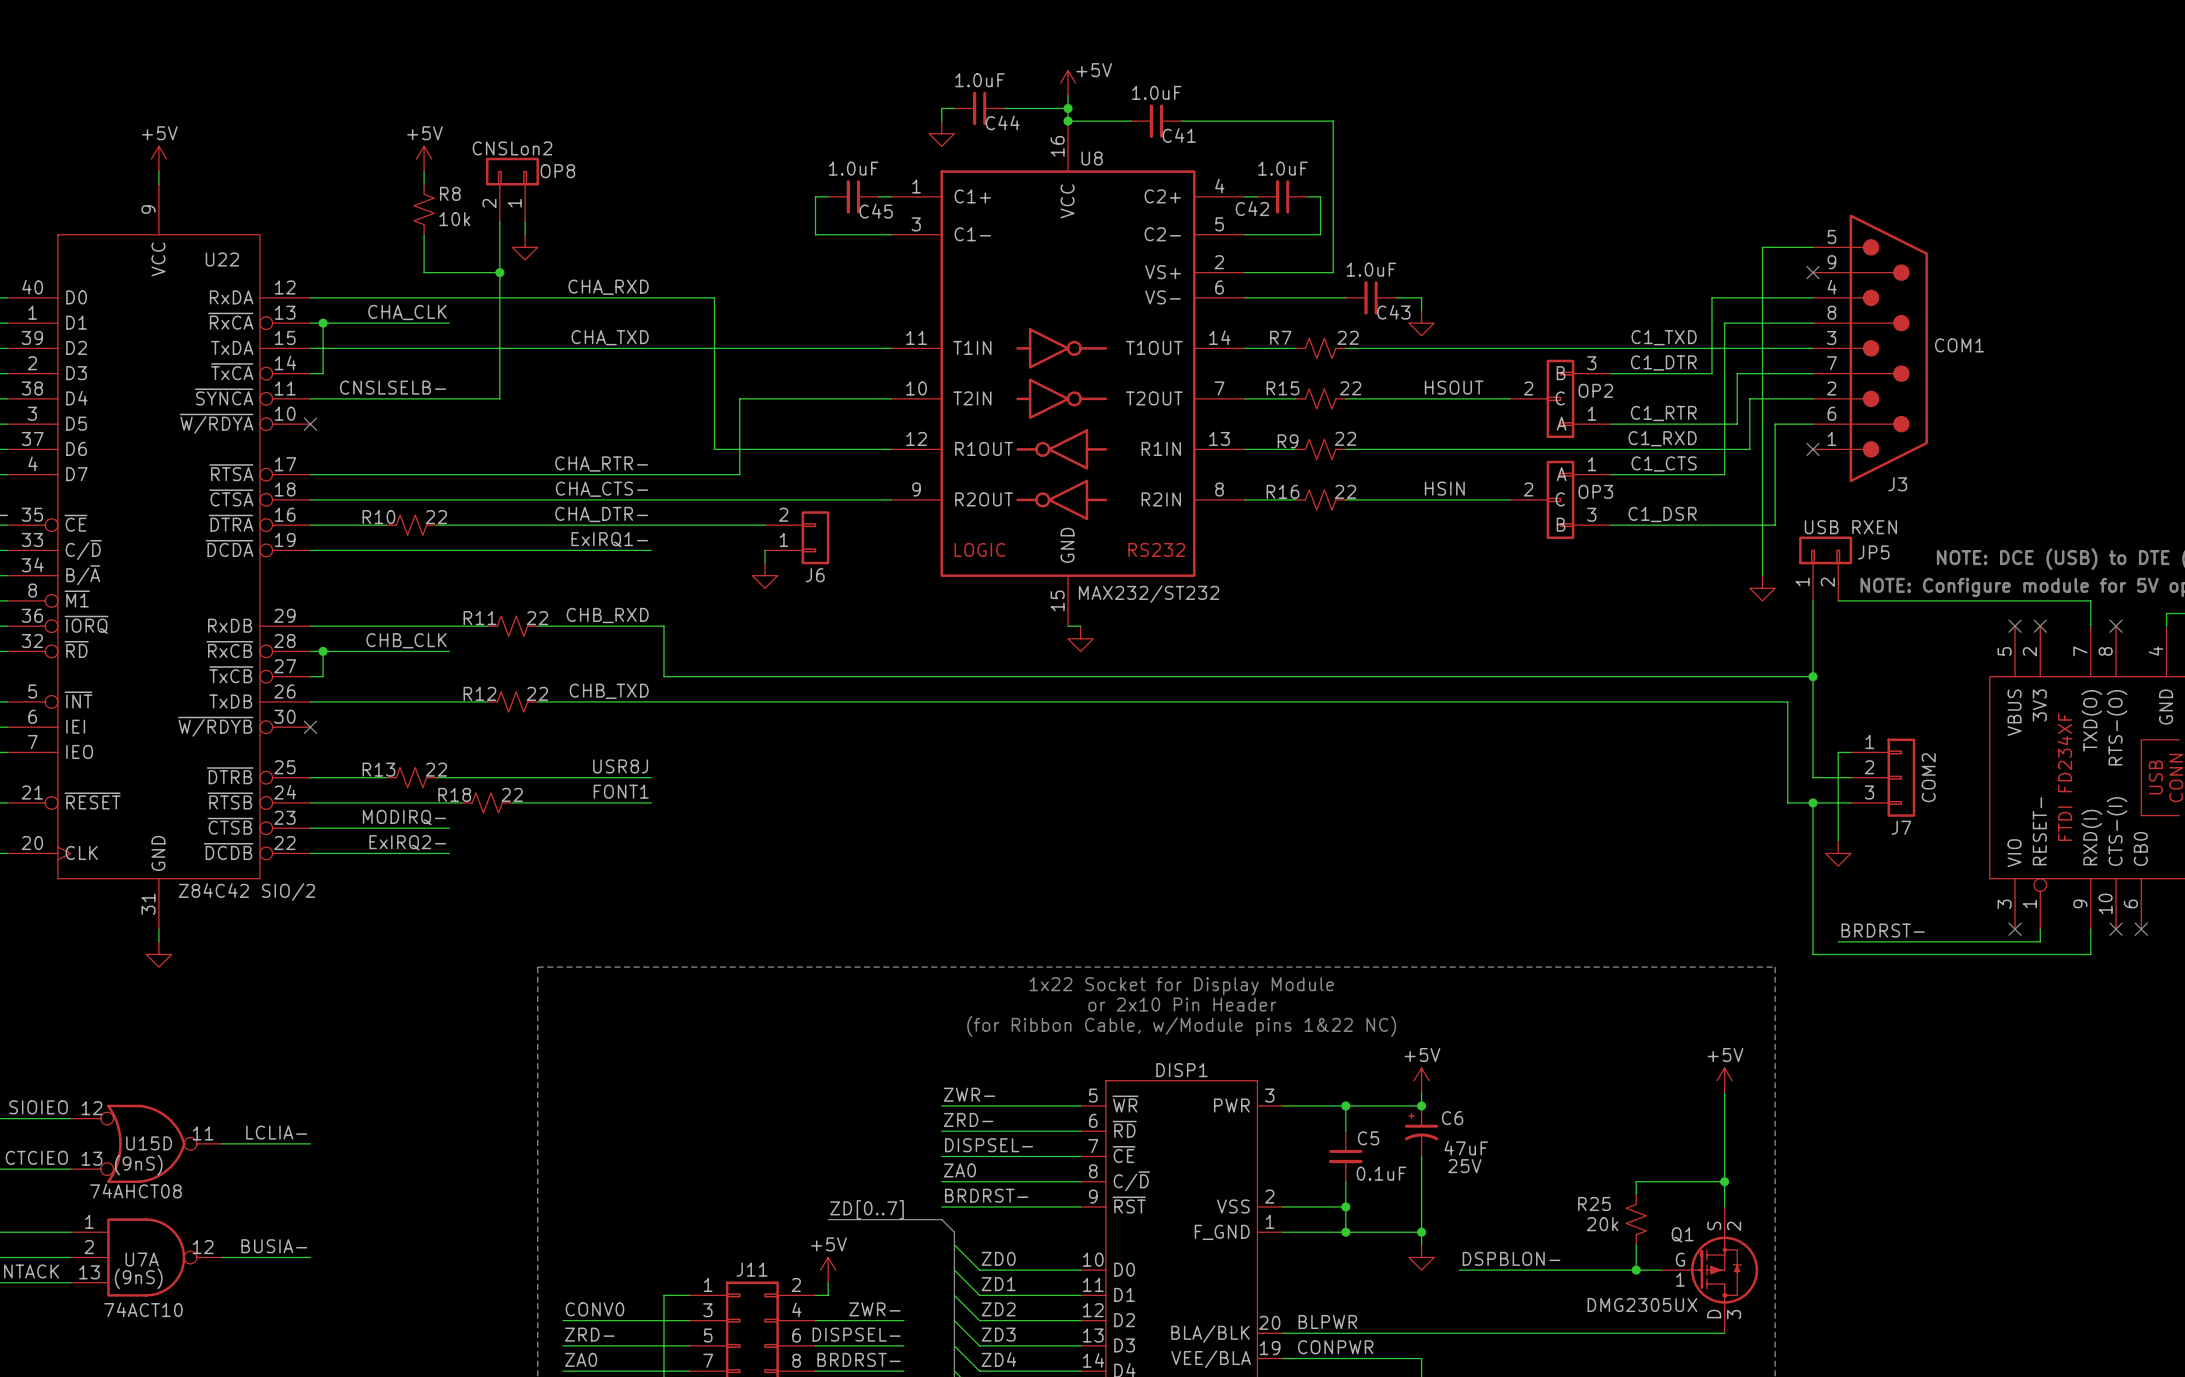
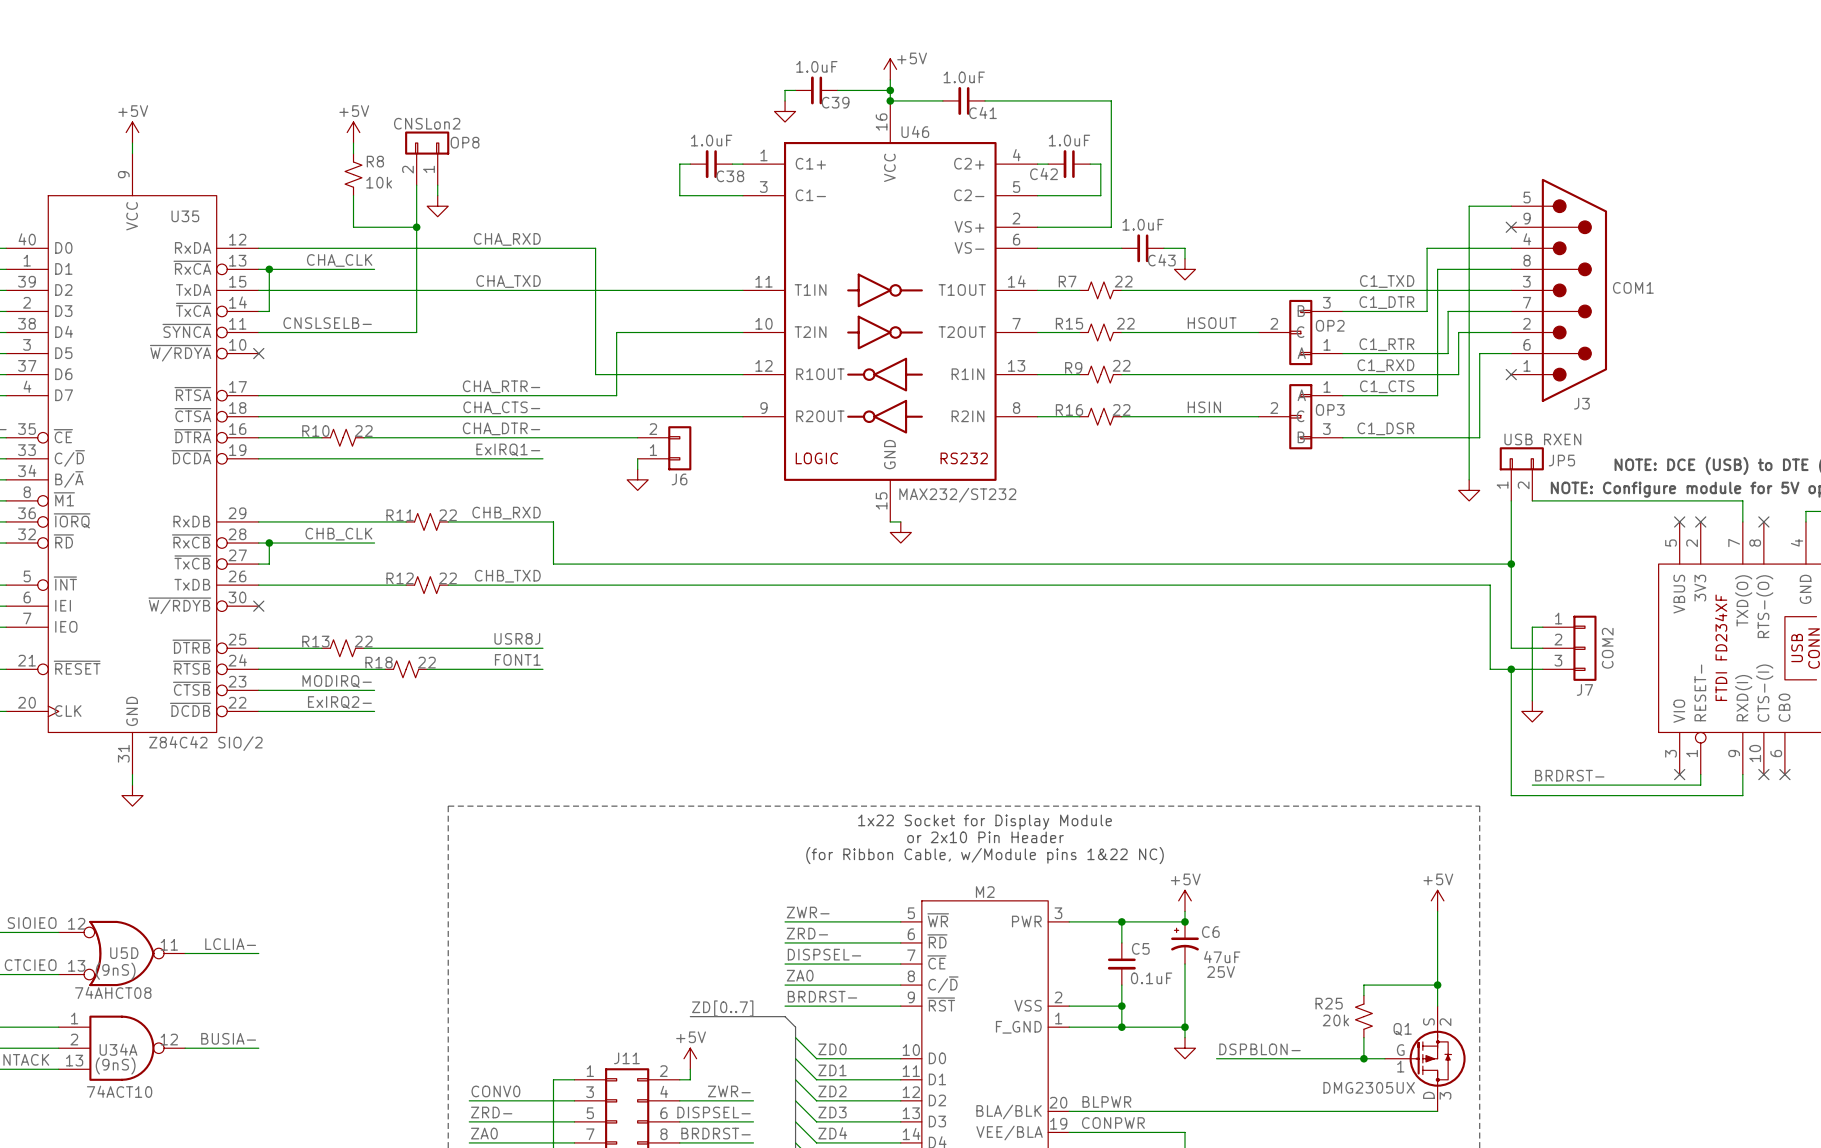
C44 name: C44 (1002, 122) -> C39 (835, 102)
U8 name: U8 (1092, 158) -> U46 (915, 131)
C45 name: C45 (876, 211) -> C38 (730, 176)
U22 name: U22 (222, 259) -> U35 (185, 216)
DISP1 name: DISP1 (1181, 1070) -> M2 (985, 892)
U15D name: U15D (149, 1143) -> U5D (124, 953)
U7A name: U7A (142, 1259) -> U34A (118, 1049)

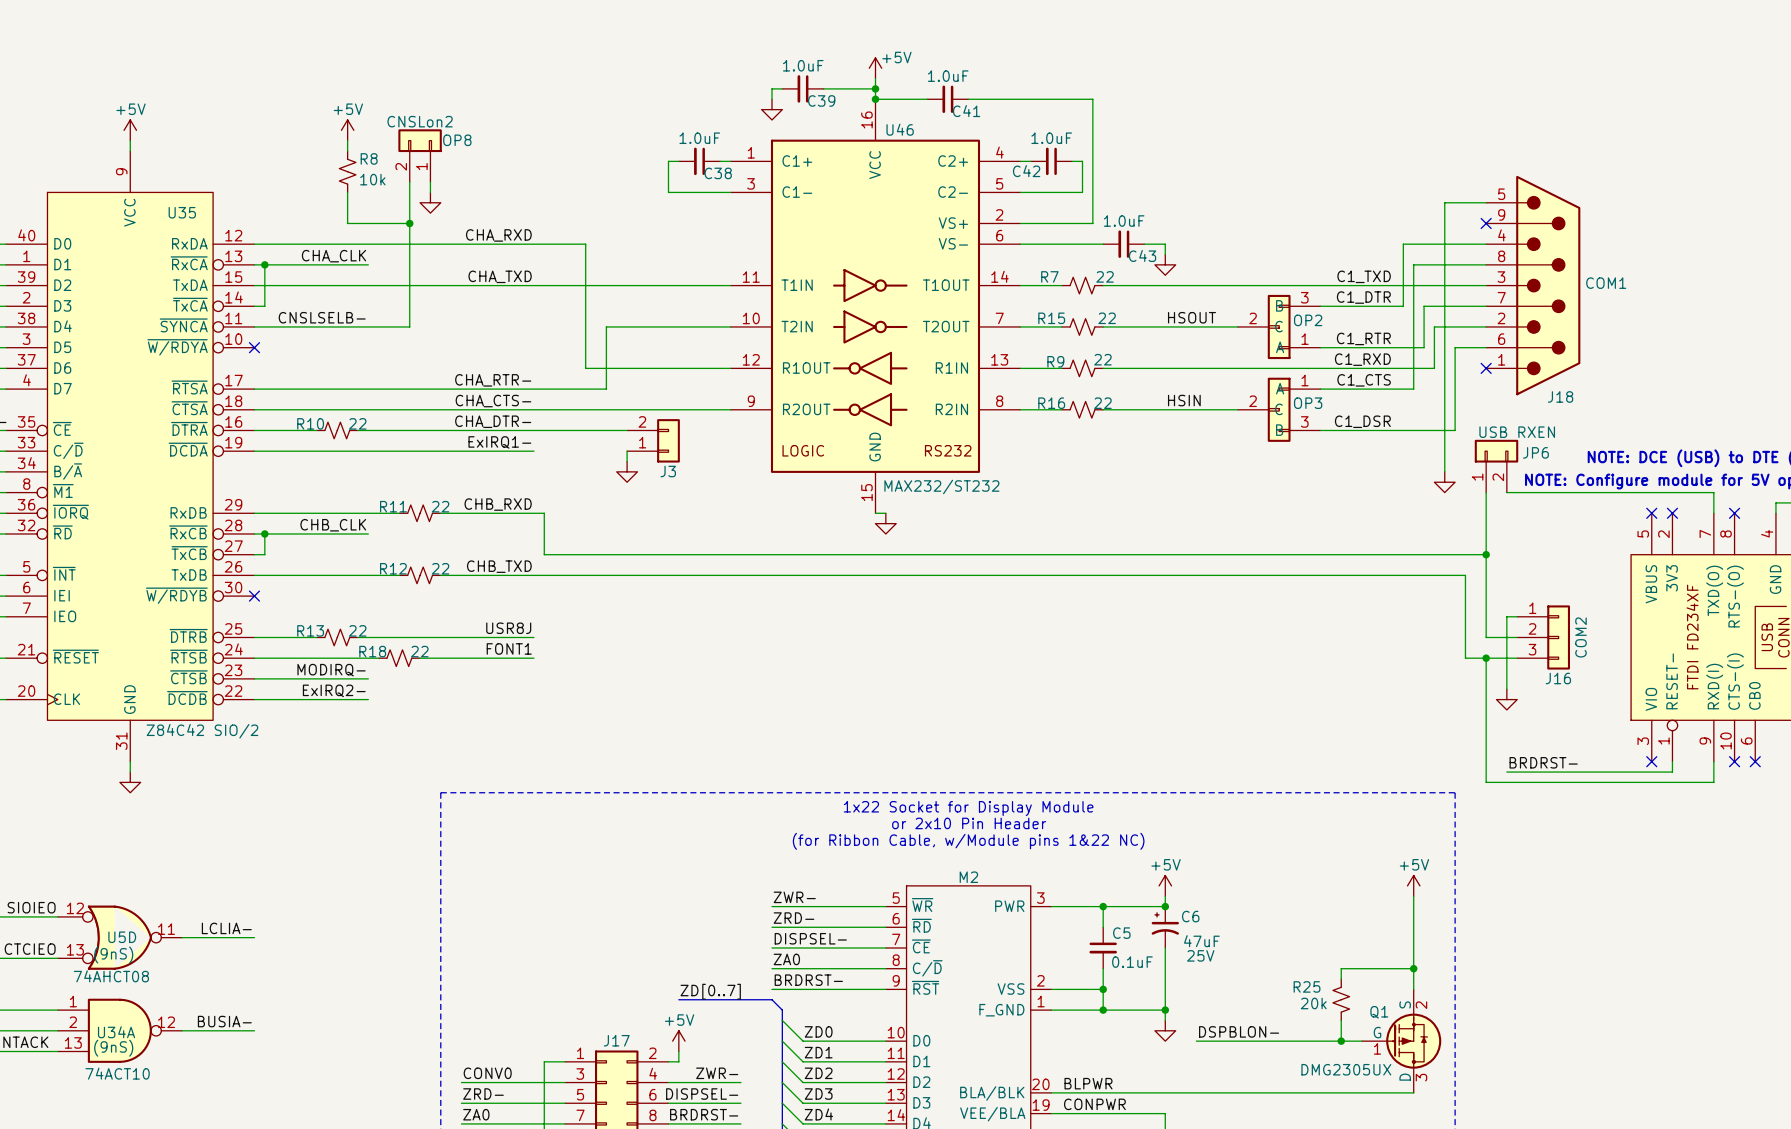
J3 name: J3 (1581, 403) -> J18 (1560, 396)
JP5 name: JP5 (1561, 460) -> JP6 (1535, 452)
J6 name: J6 (679, 479) -> J3 (668, 471)
J7 name: J7 (1584, 689) -> J16 (1558, 678)
J11 name: J11 (626, 1058) -> J17 (616, 1040)

